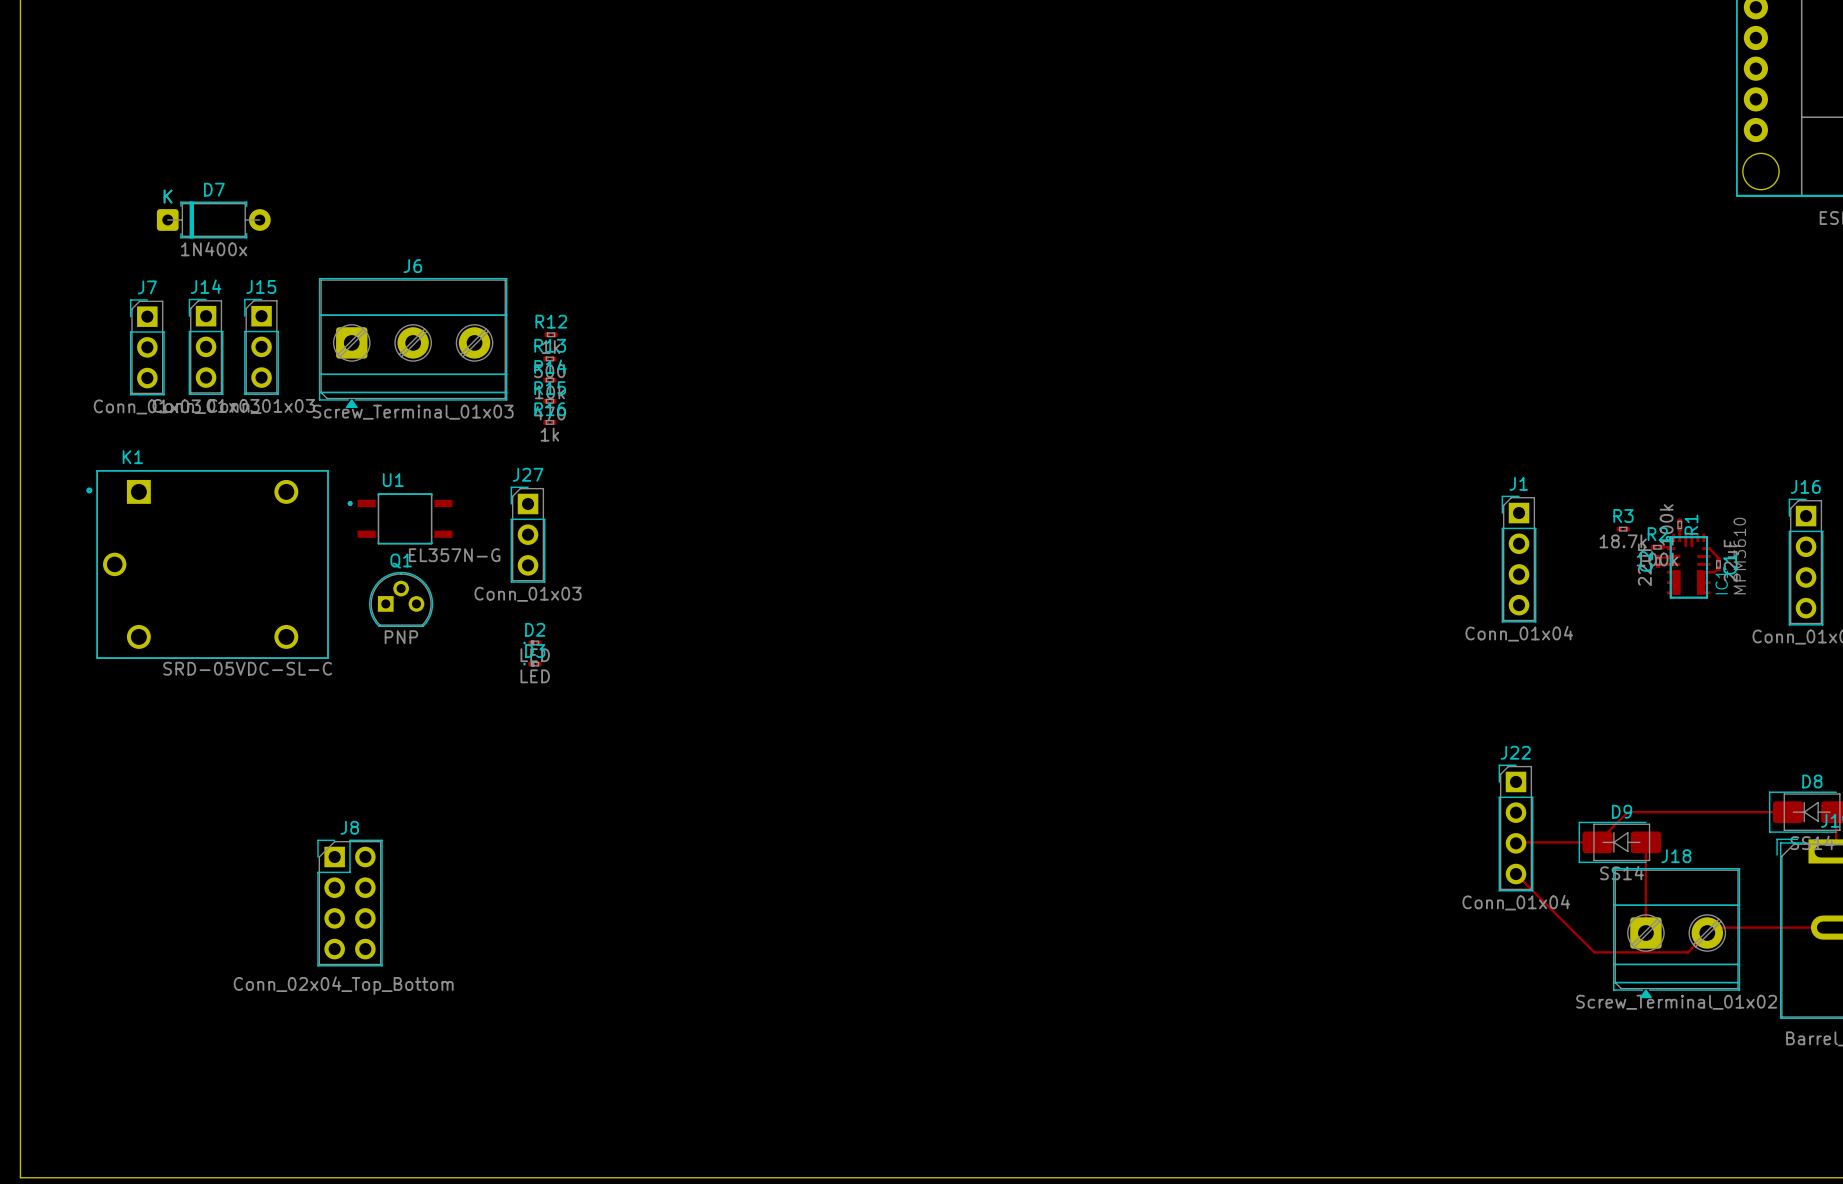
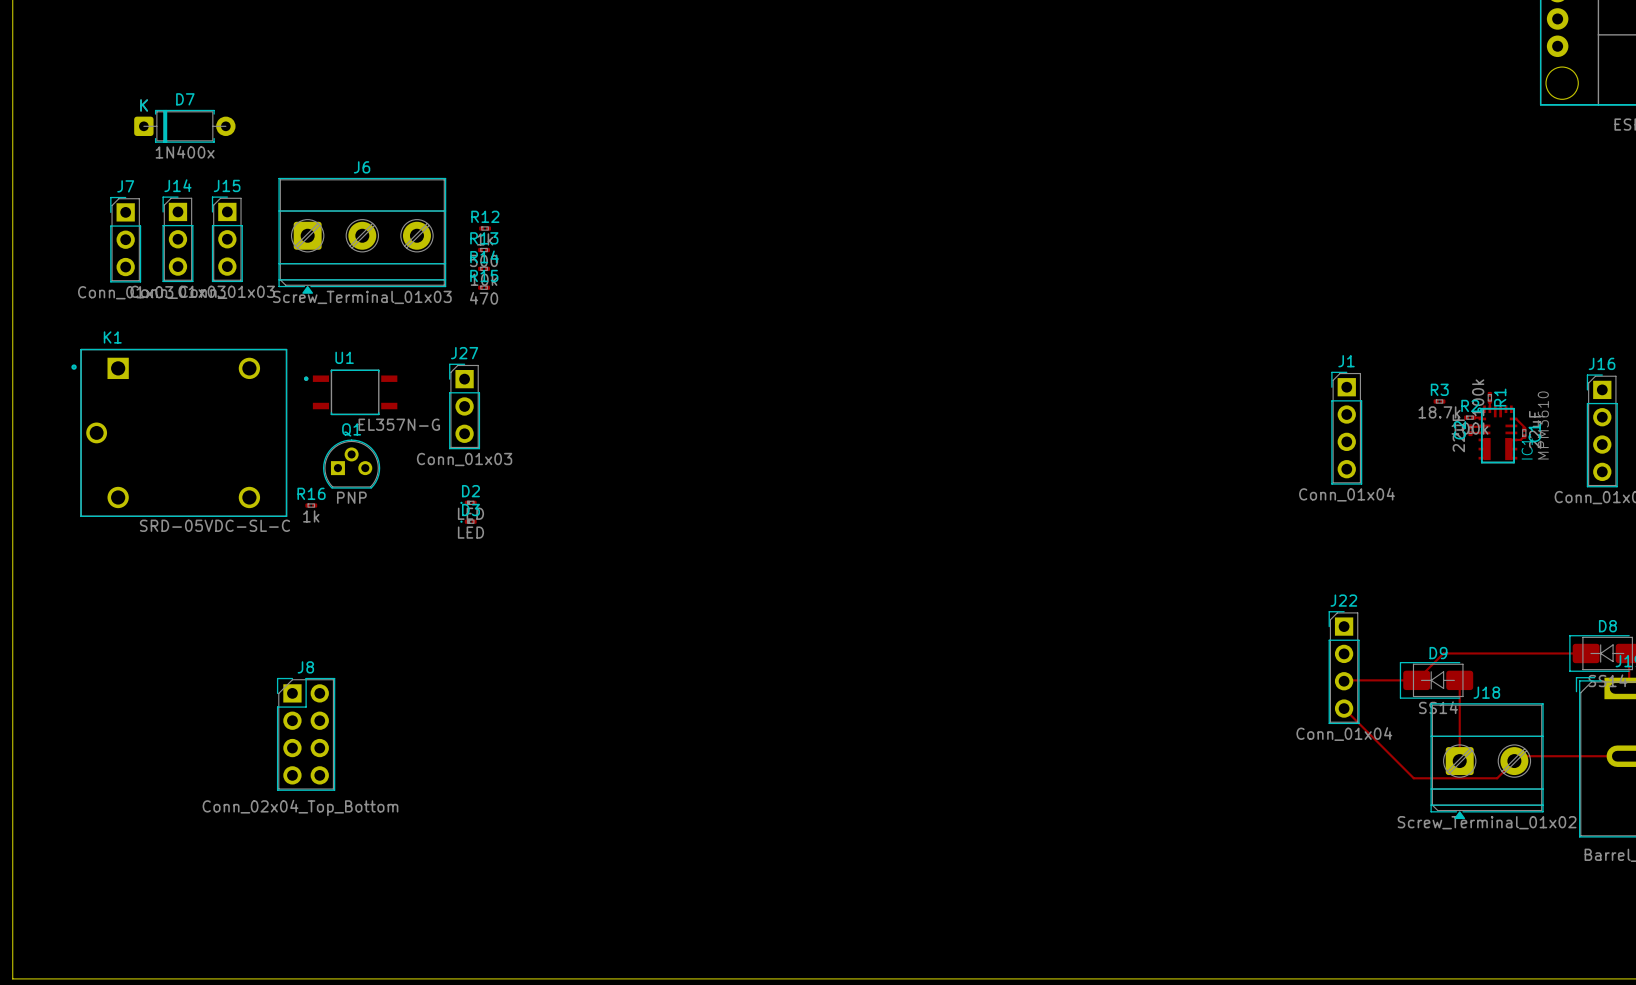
R16 position: (549, 422) -> (311, 505)

